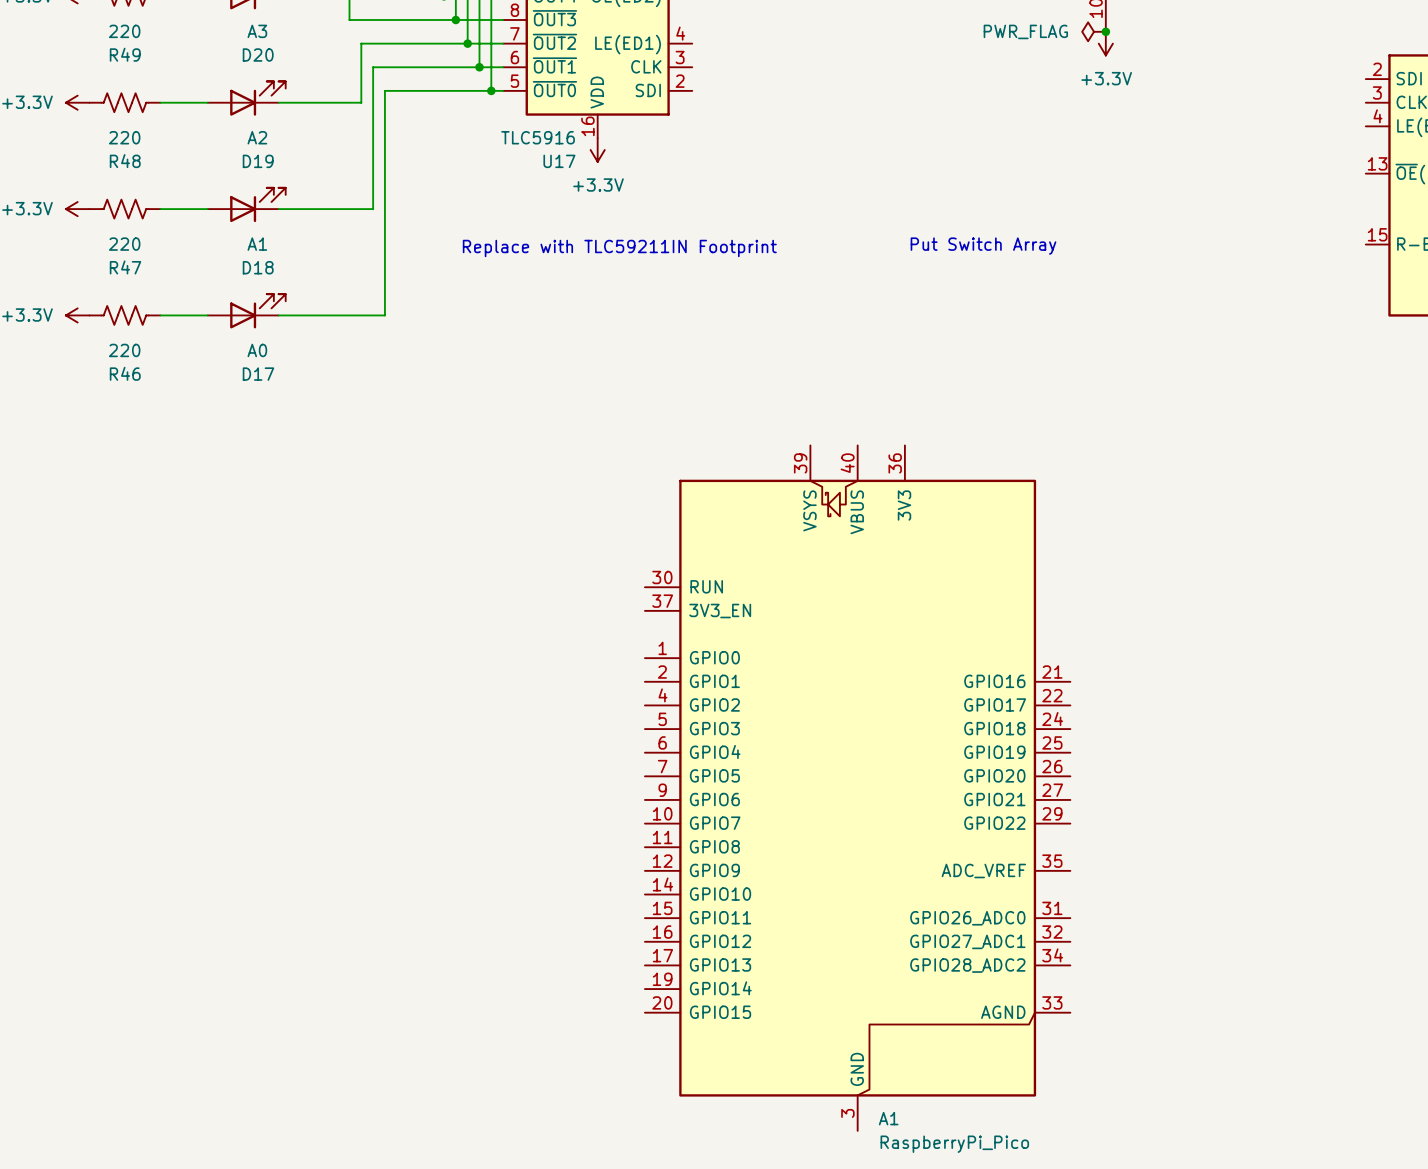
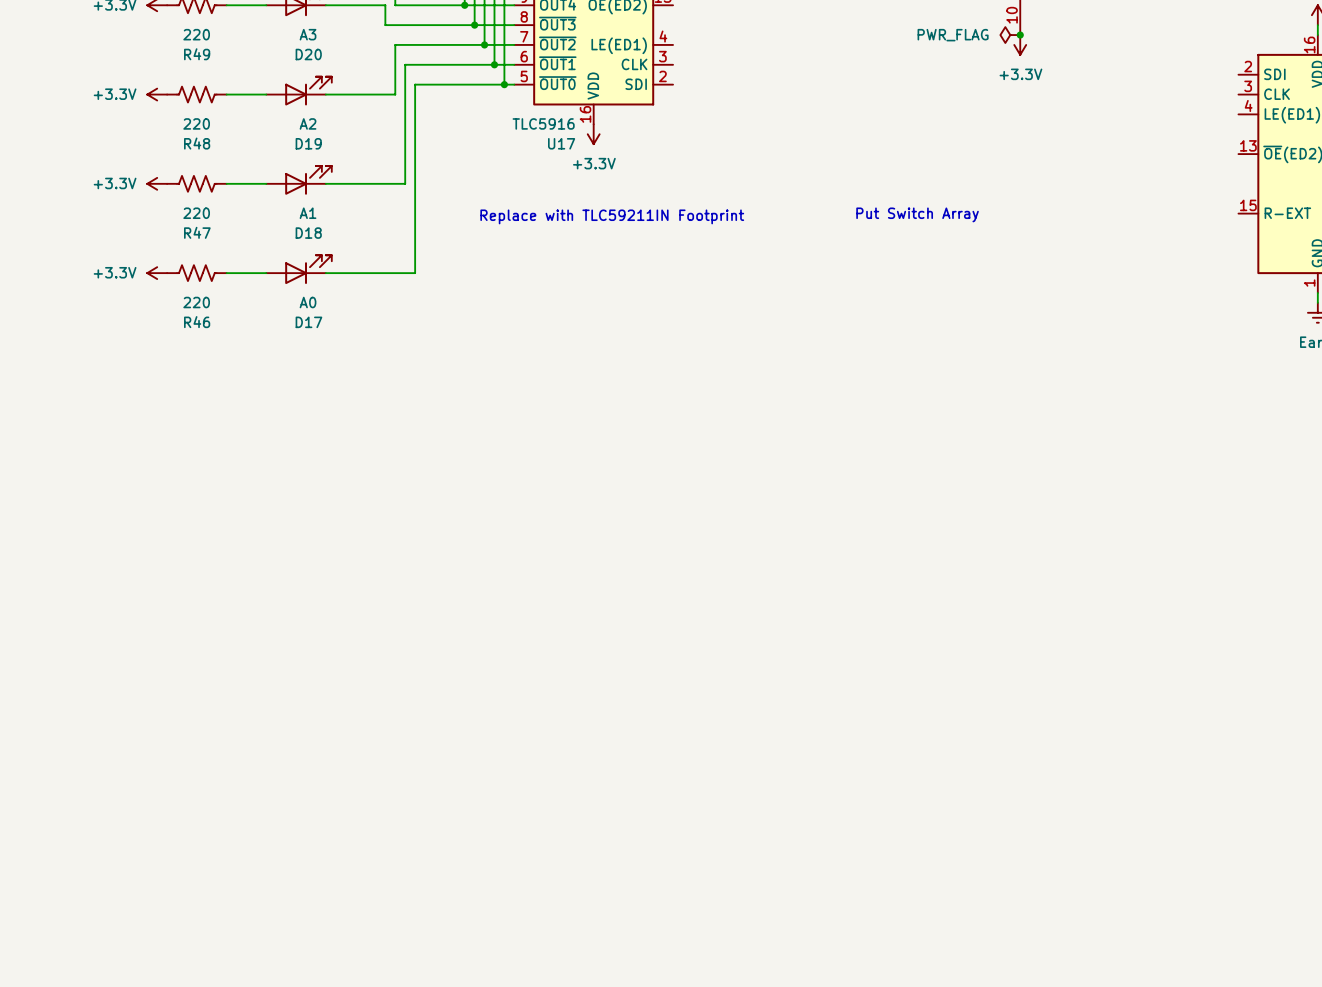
A1: RaspberryPi_Pico (857, 788) -> none

